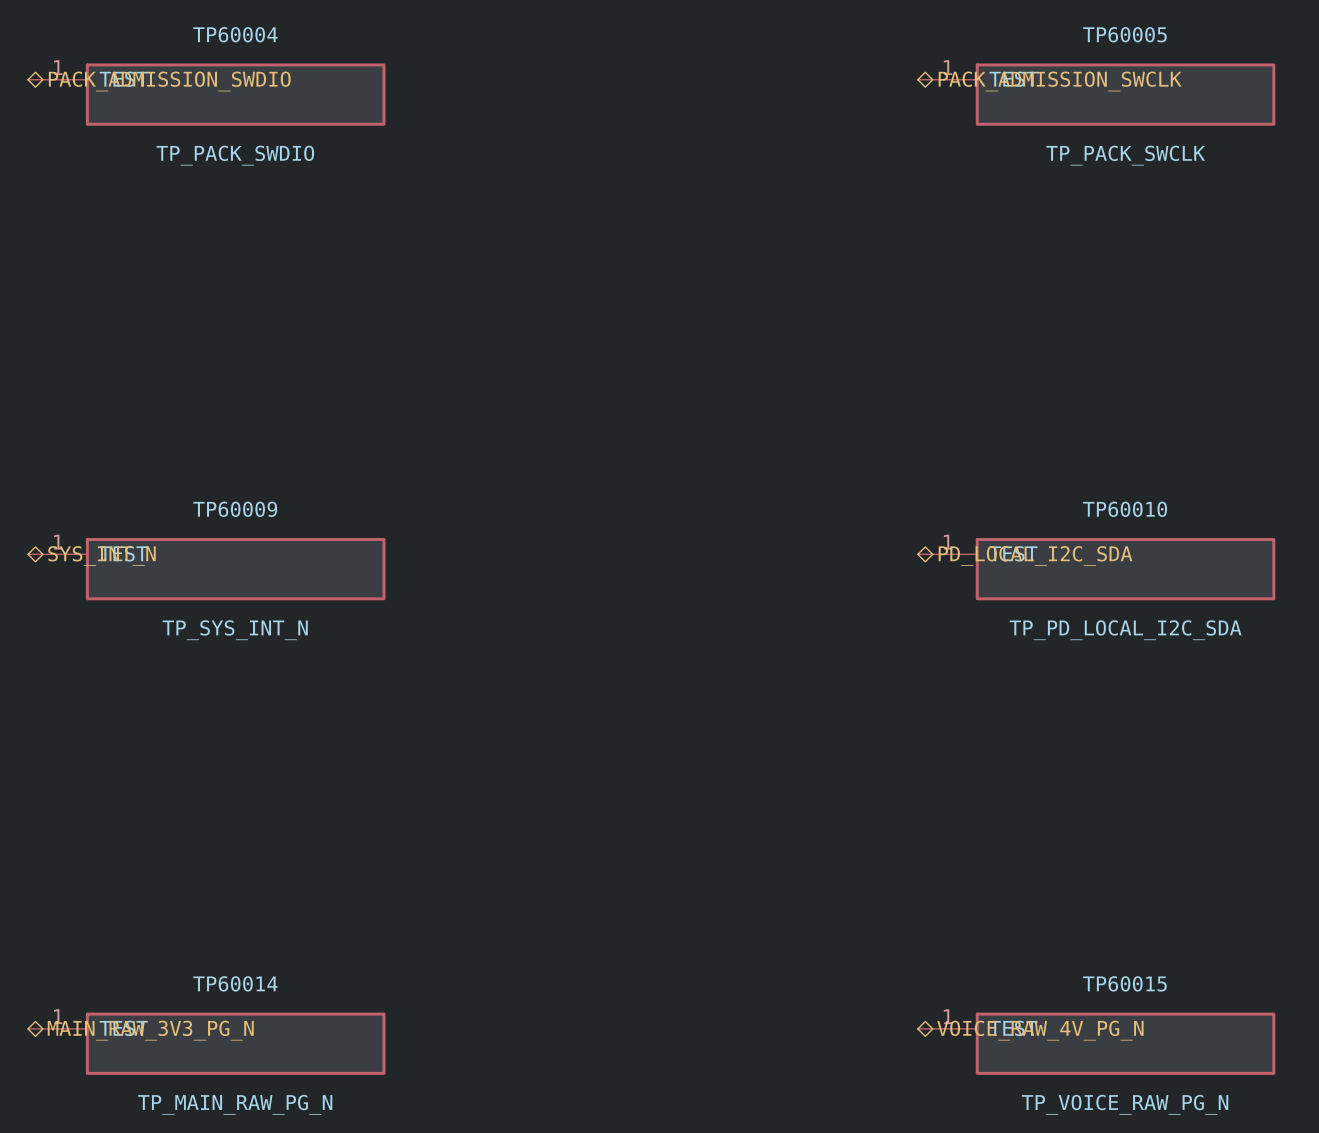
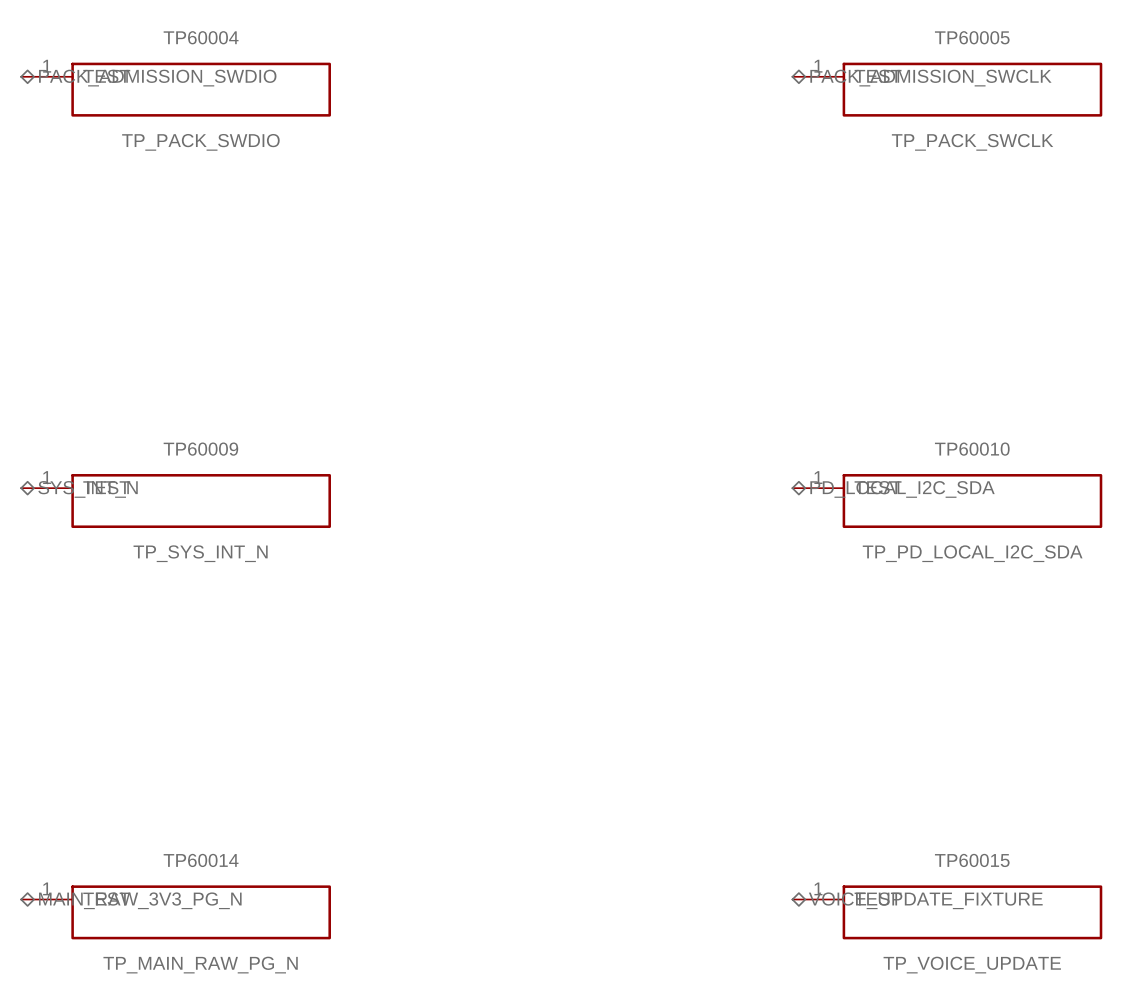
hierarchical label: VOICE_RAW_4V_PG_N (1040, 1030) -> VOICE_UPDATE_FIXTURE (925, 900)
TP60015 value: TP_VOICE_RAW_PG_N (1125, 1104) -> TP_VOICE_UPDATE (972, 965)

